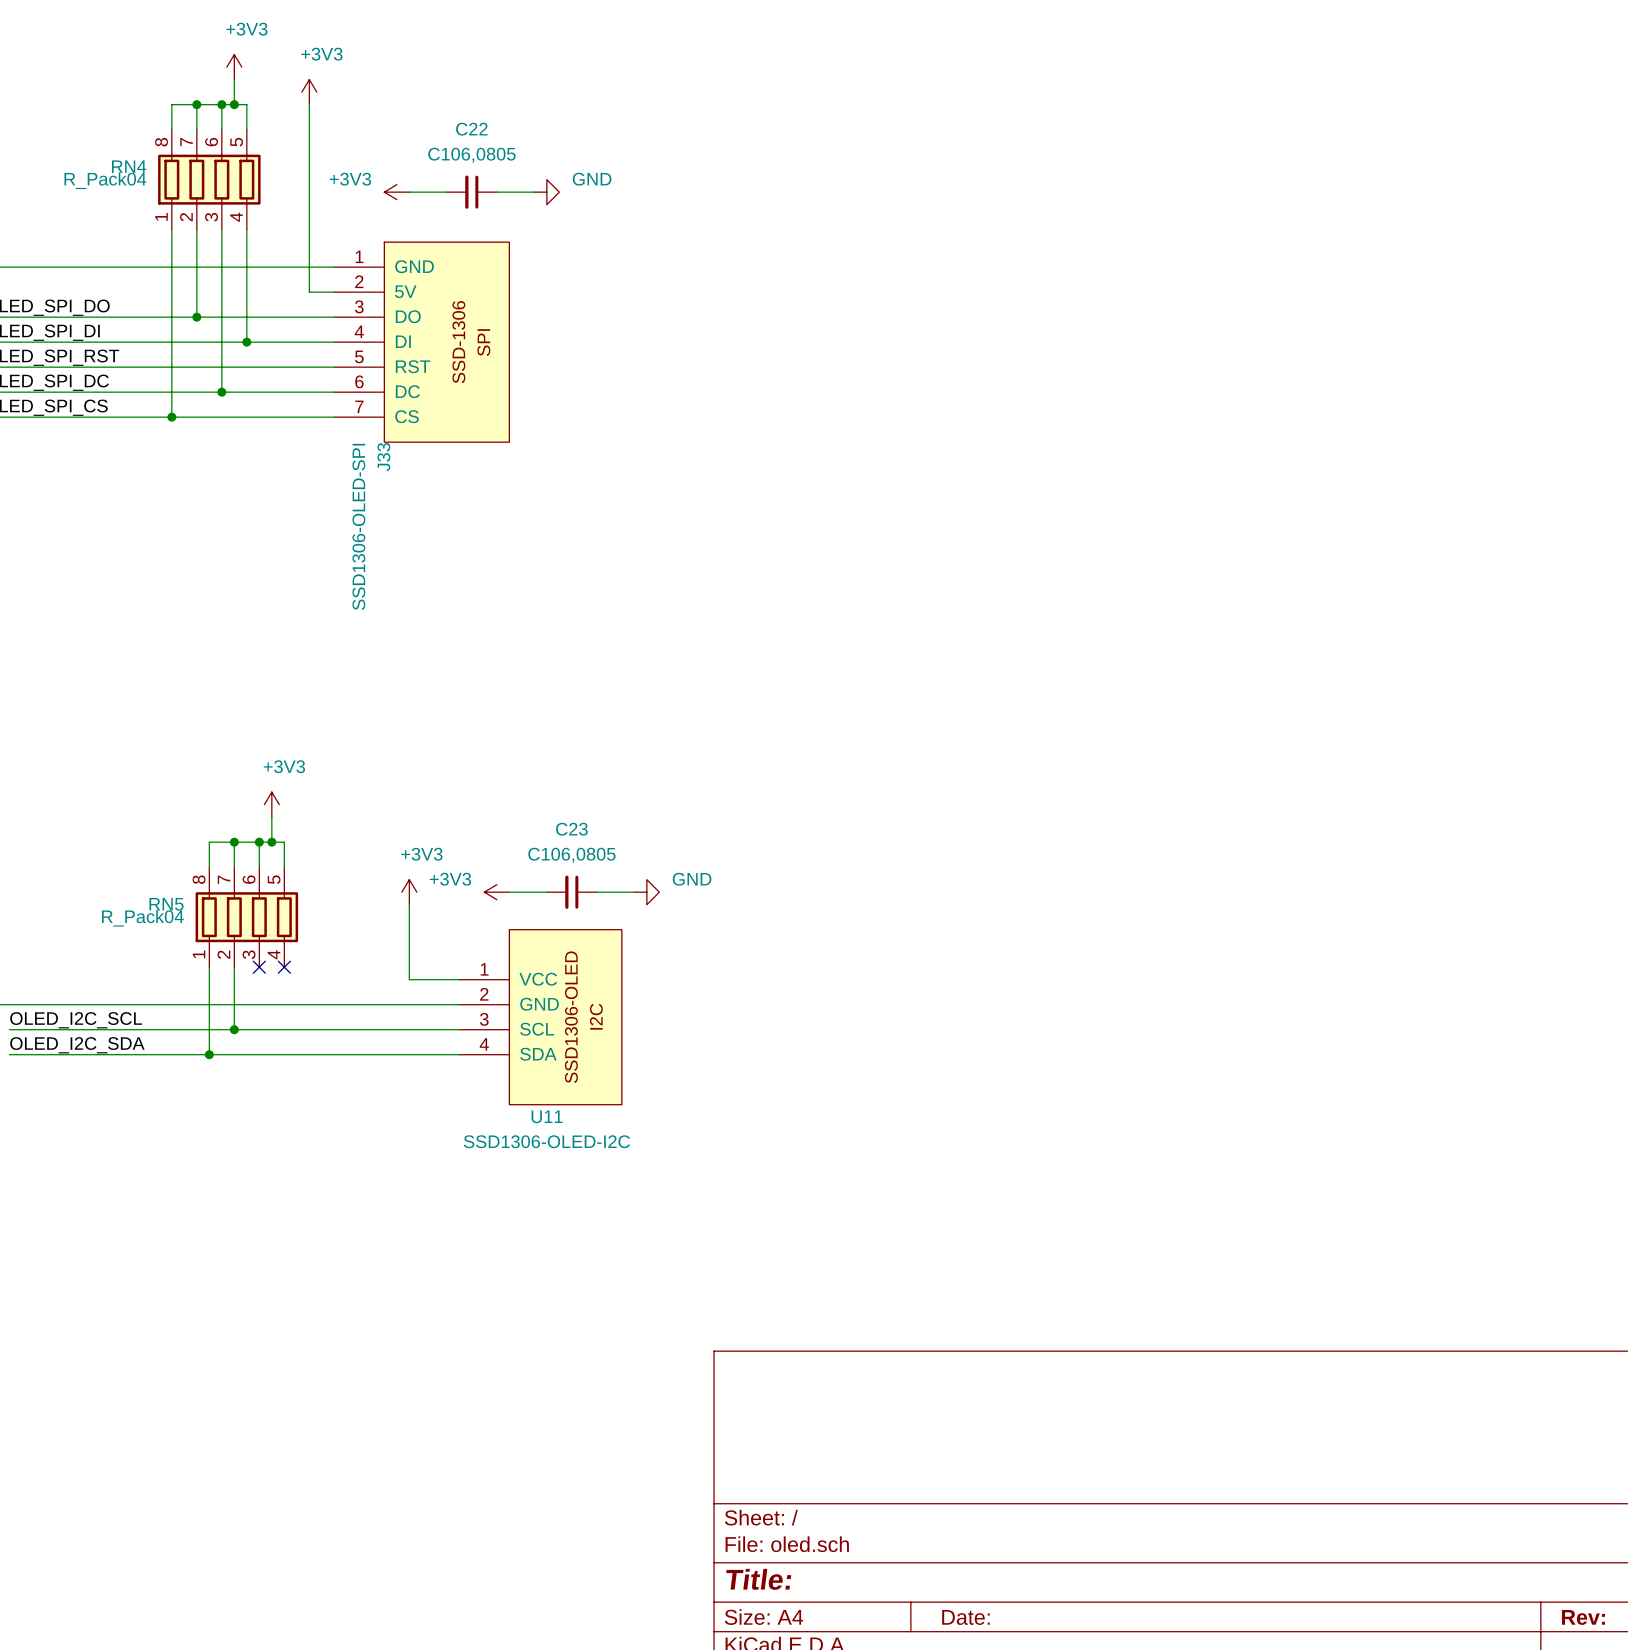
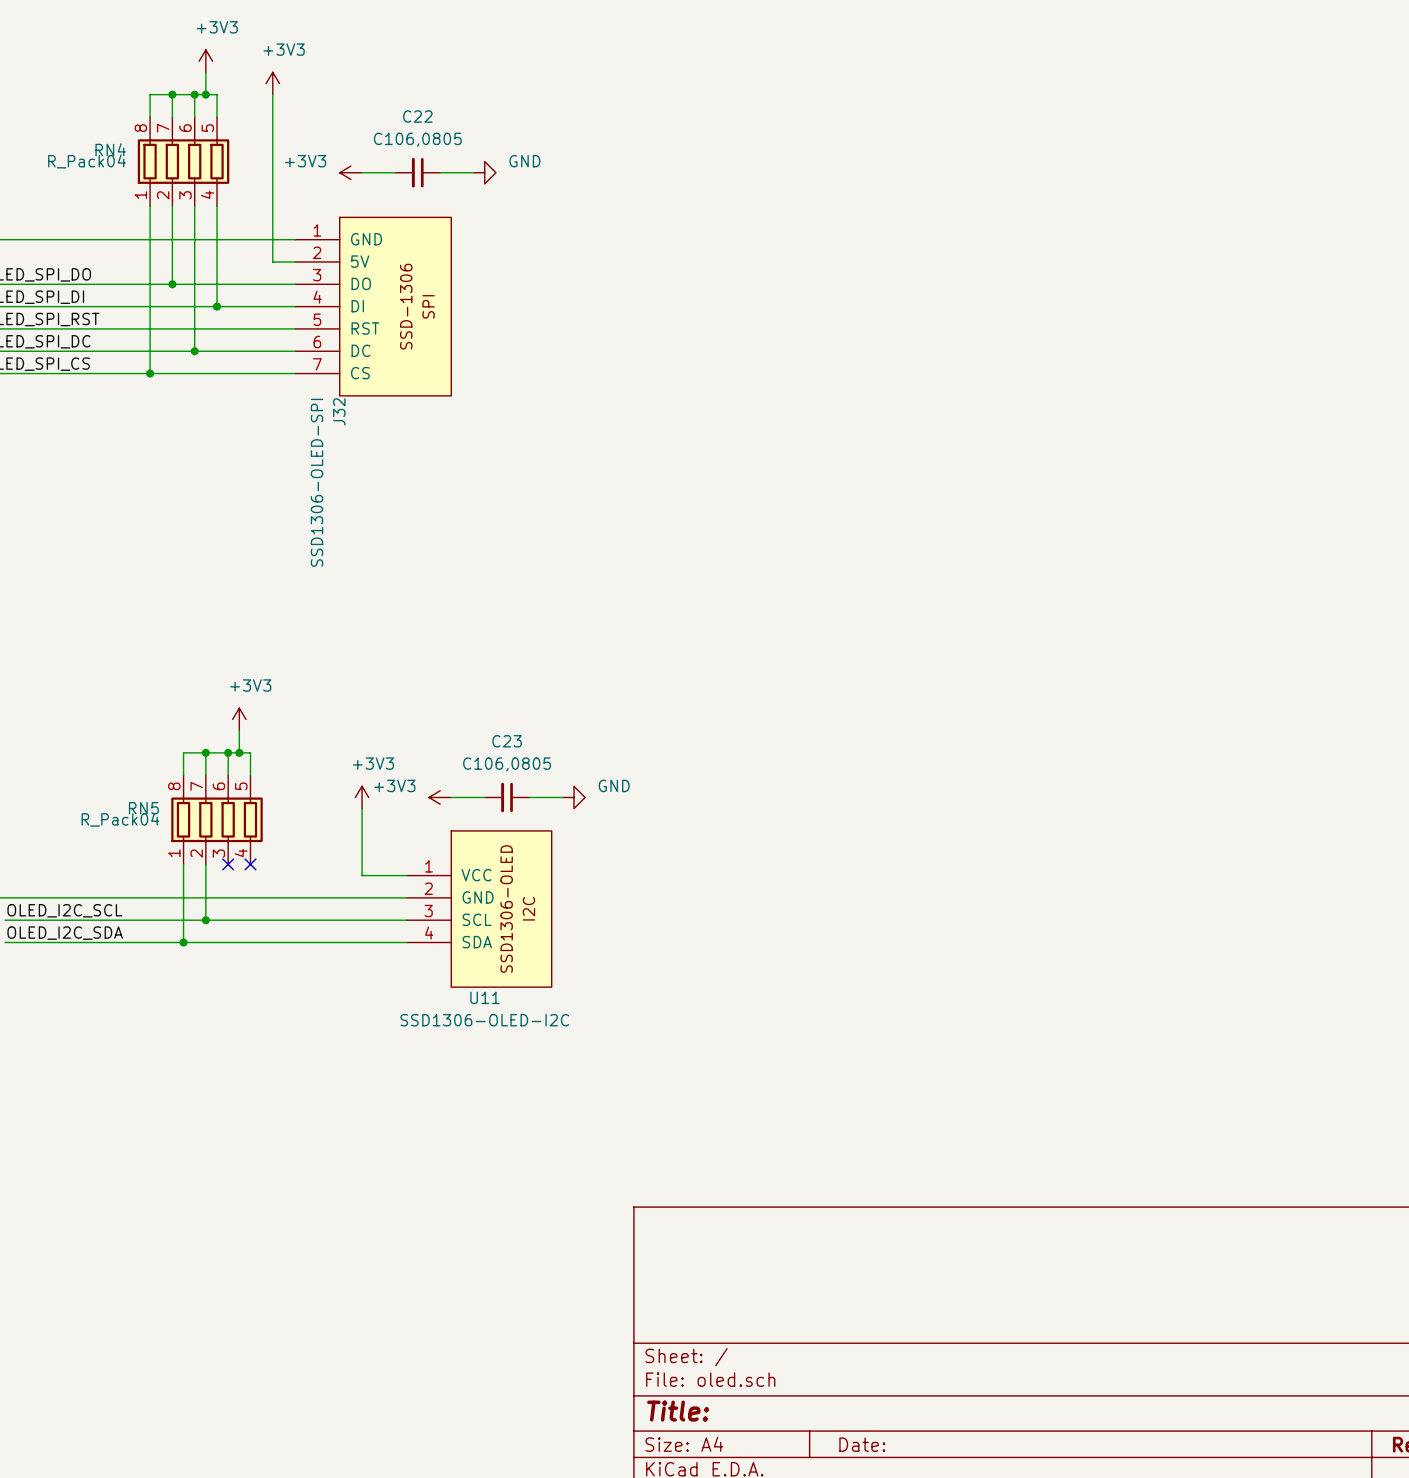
J33 name: J33 (383, 457) -> J32 (339, 411)

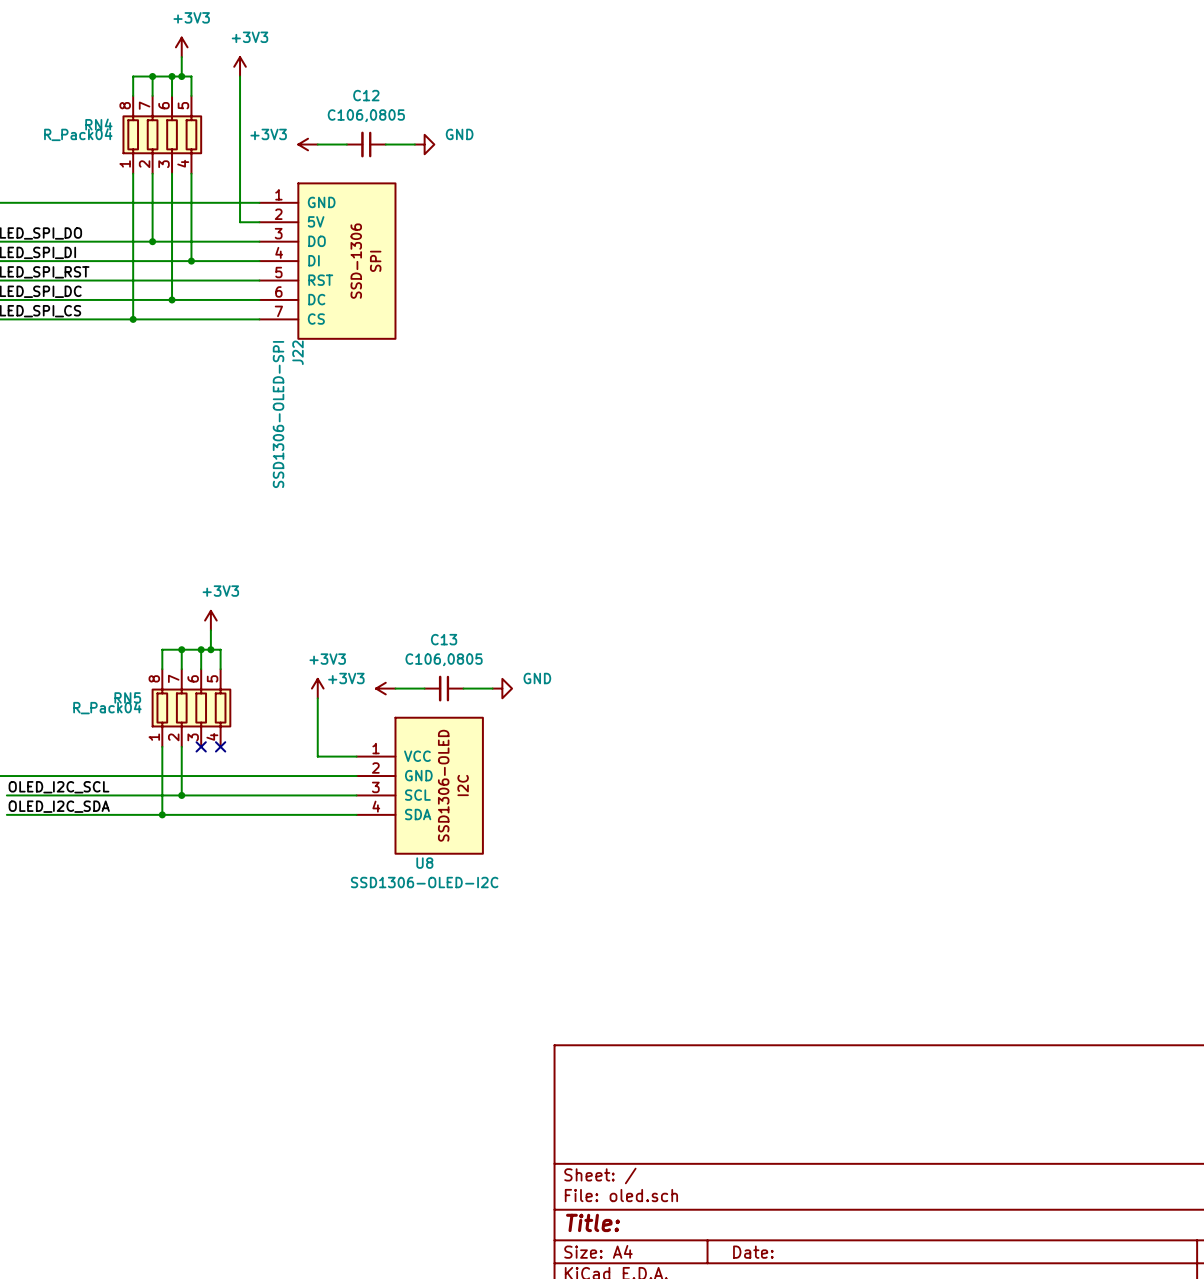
C22 name: C22 (417, 116) -> C12 (366, 95)
J32 name: J32 (339, 411) -> J22 (297, 352)
C23 name: C23 (507, 741) -> C13 (444, 639)
U11 name: U11 (485, 997) -> U8 (424, 863)

